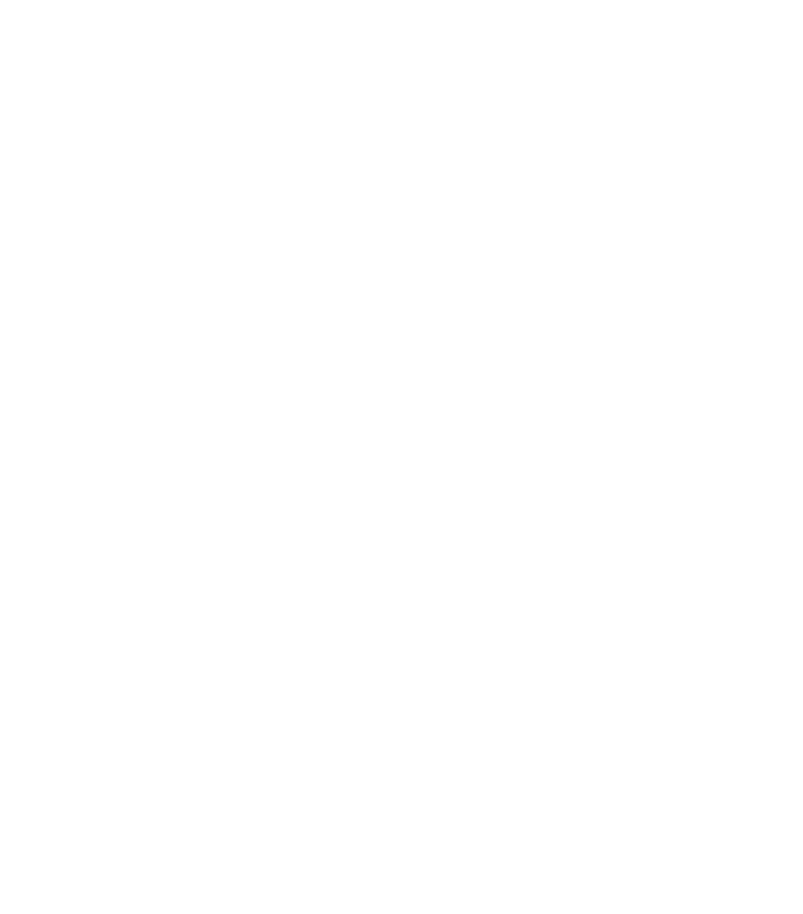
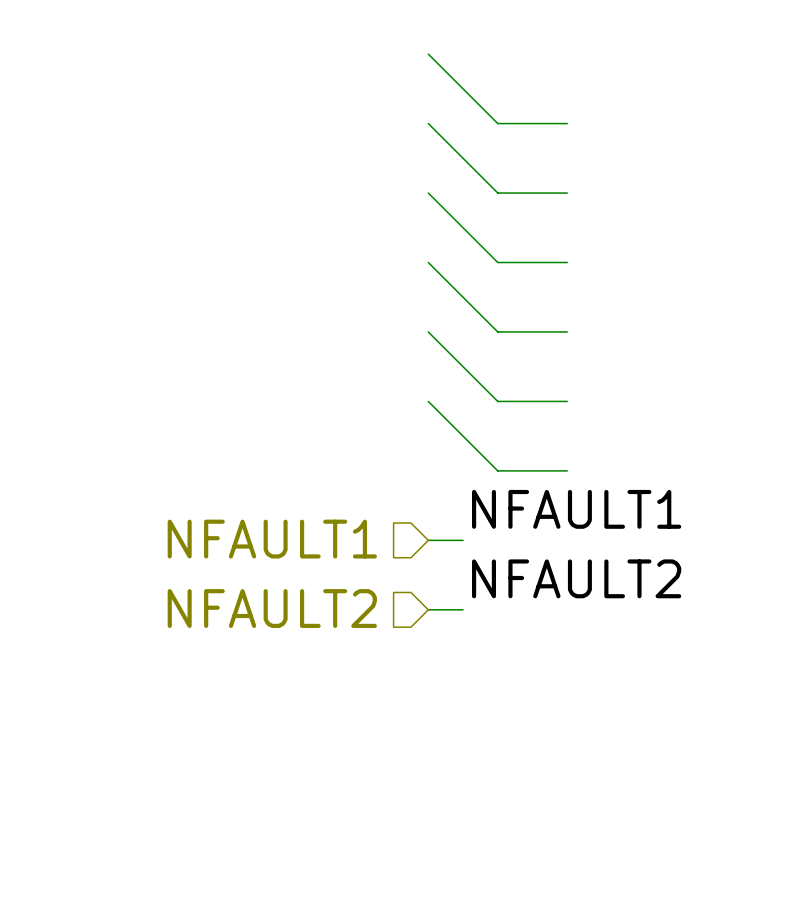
wire: none -> (428, 54) (497, 123) (567, 123)
wire: none -> (428, 123) (497, 193) (567, 193)
wire: none -> (428, 193) (497, 262) (567, 262)
wire: none -> (428, 262) (497, 331) (567, 331)
wire: none -> (428, 331) (497, 401) (567, 401)
wire: none -> (428, 401) (497, 470) (567, 470)
label: none -> NFAULT1 (576, 509)
hierarchical label: none -> NFAULT1 (272, 539)
wire: none -> (428, 540) (463, 540)
label: none -> NFAULT2 (576, 578)
hierarchical label: none -> NFAULT2 (272, 608)
wire: none -> (428, 609) (463, 609)

